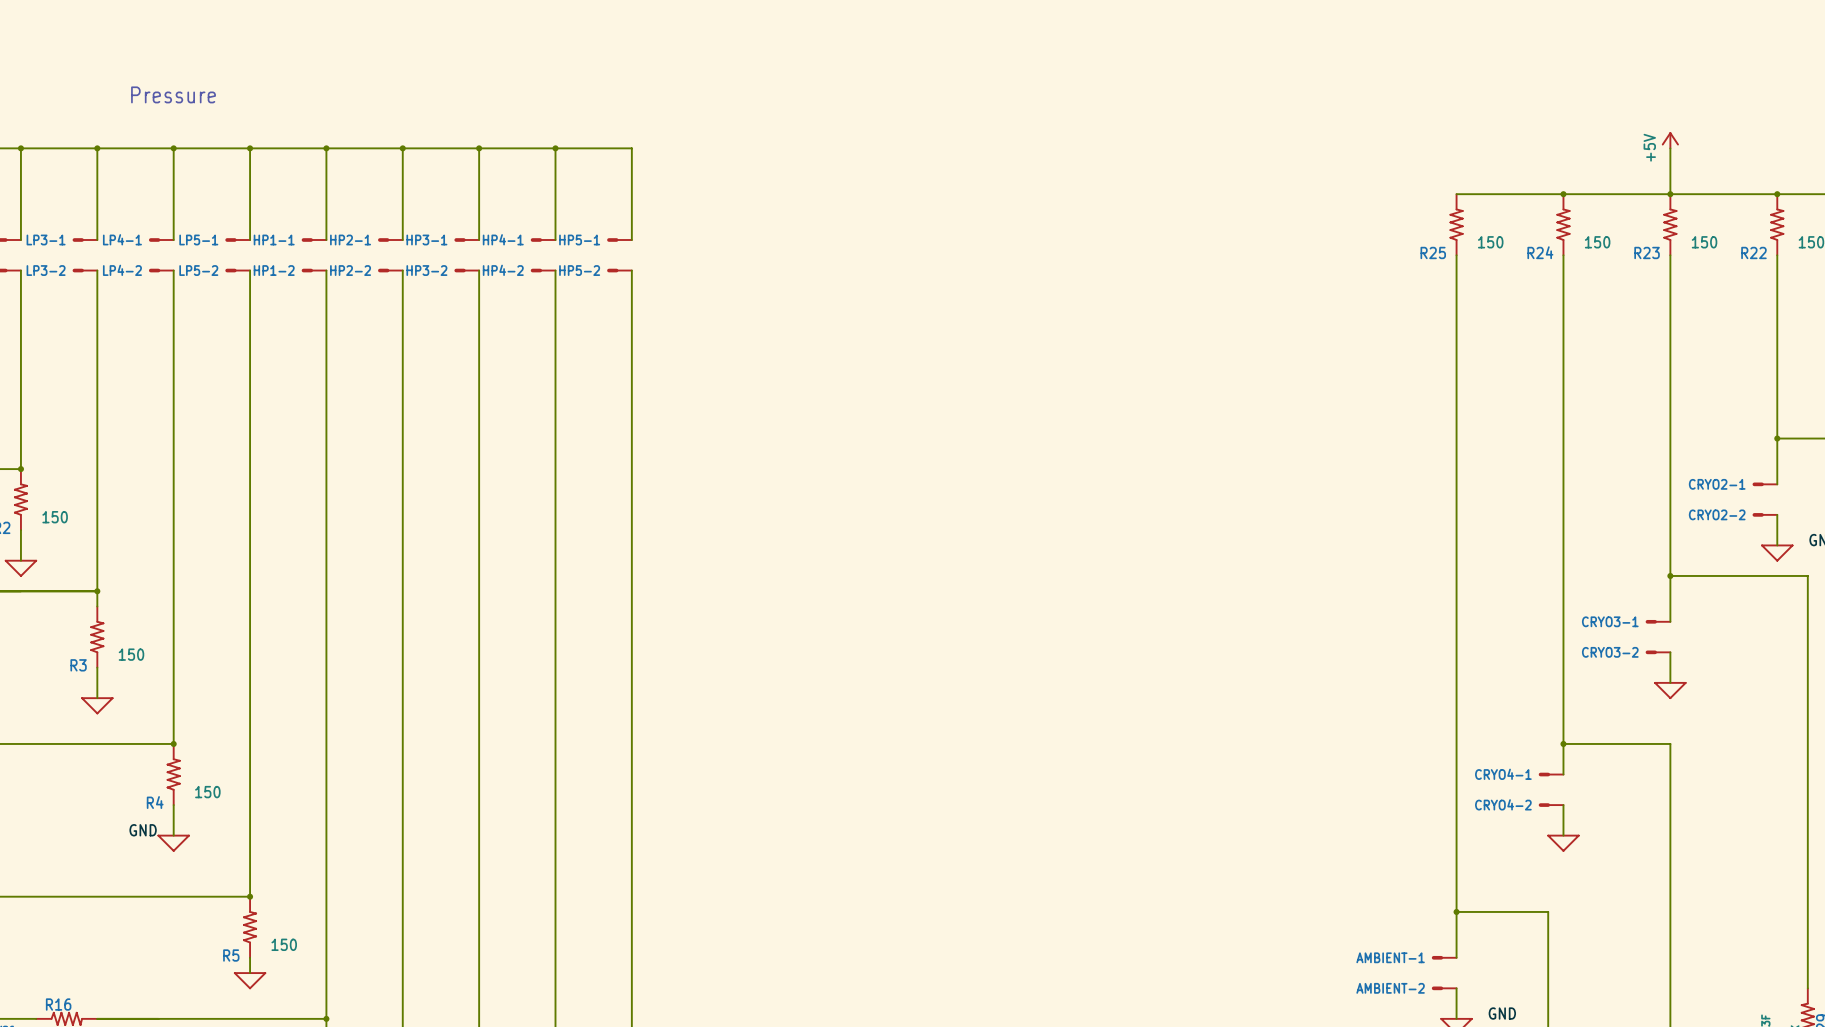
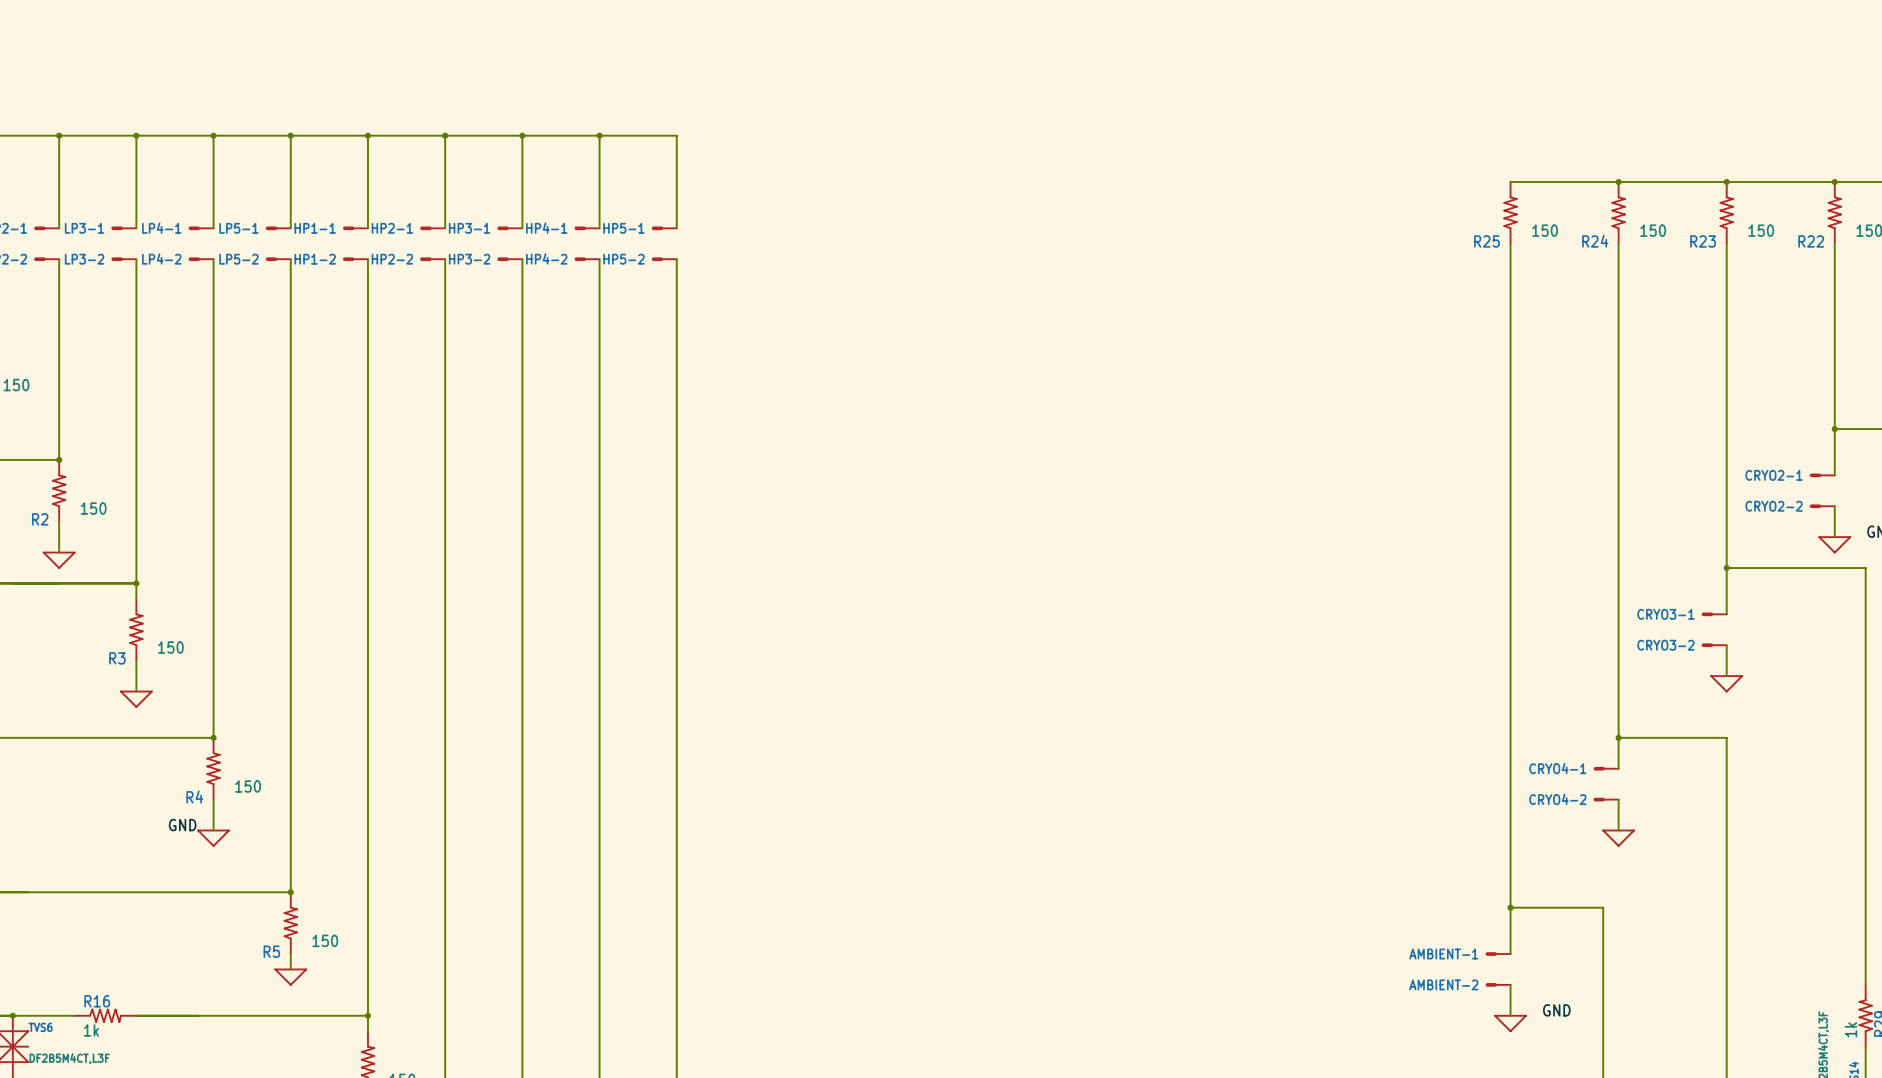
text: Pressure (173, 94) -> none
power symbol: +5V (1670, 140) -> none
wire: (1670, 148) (1670, 194) -> none

